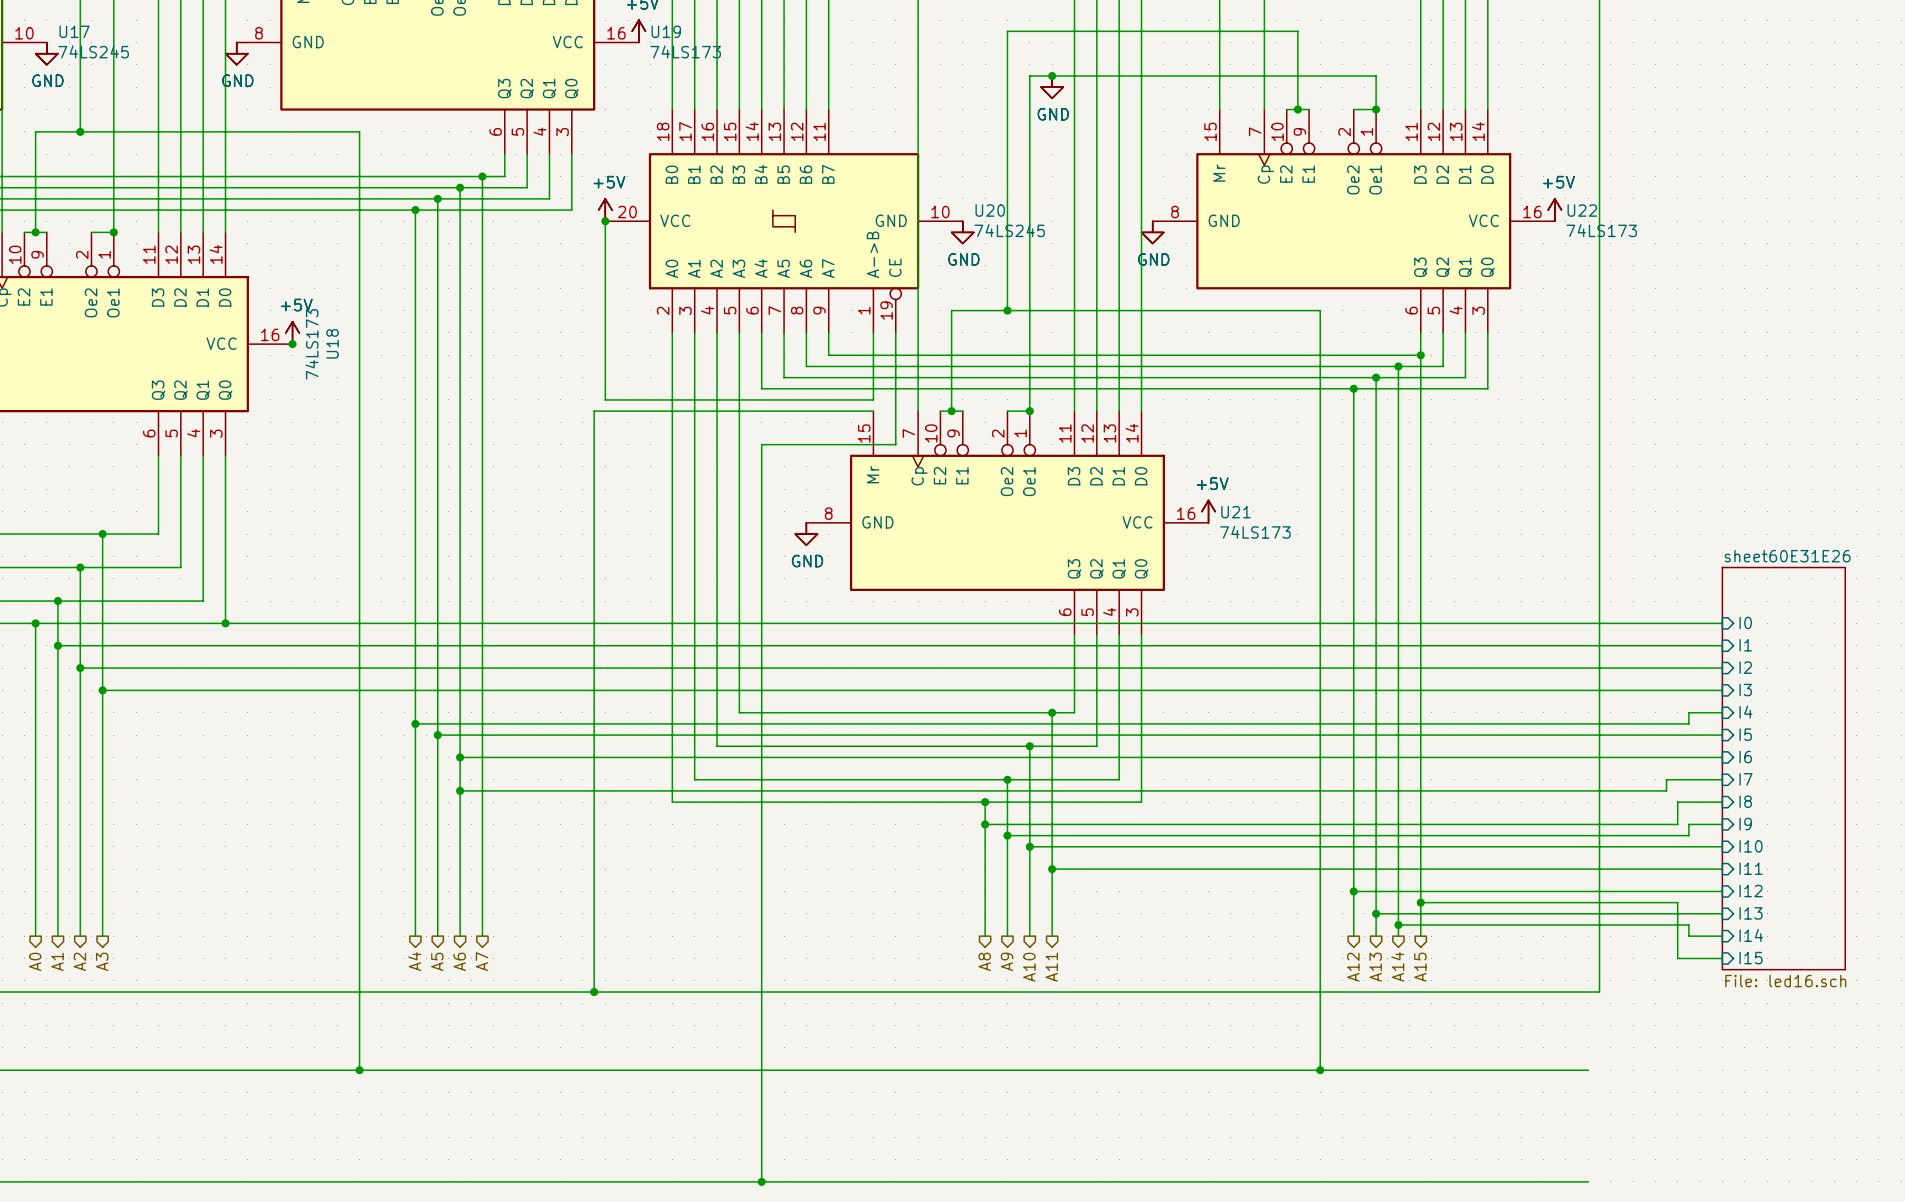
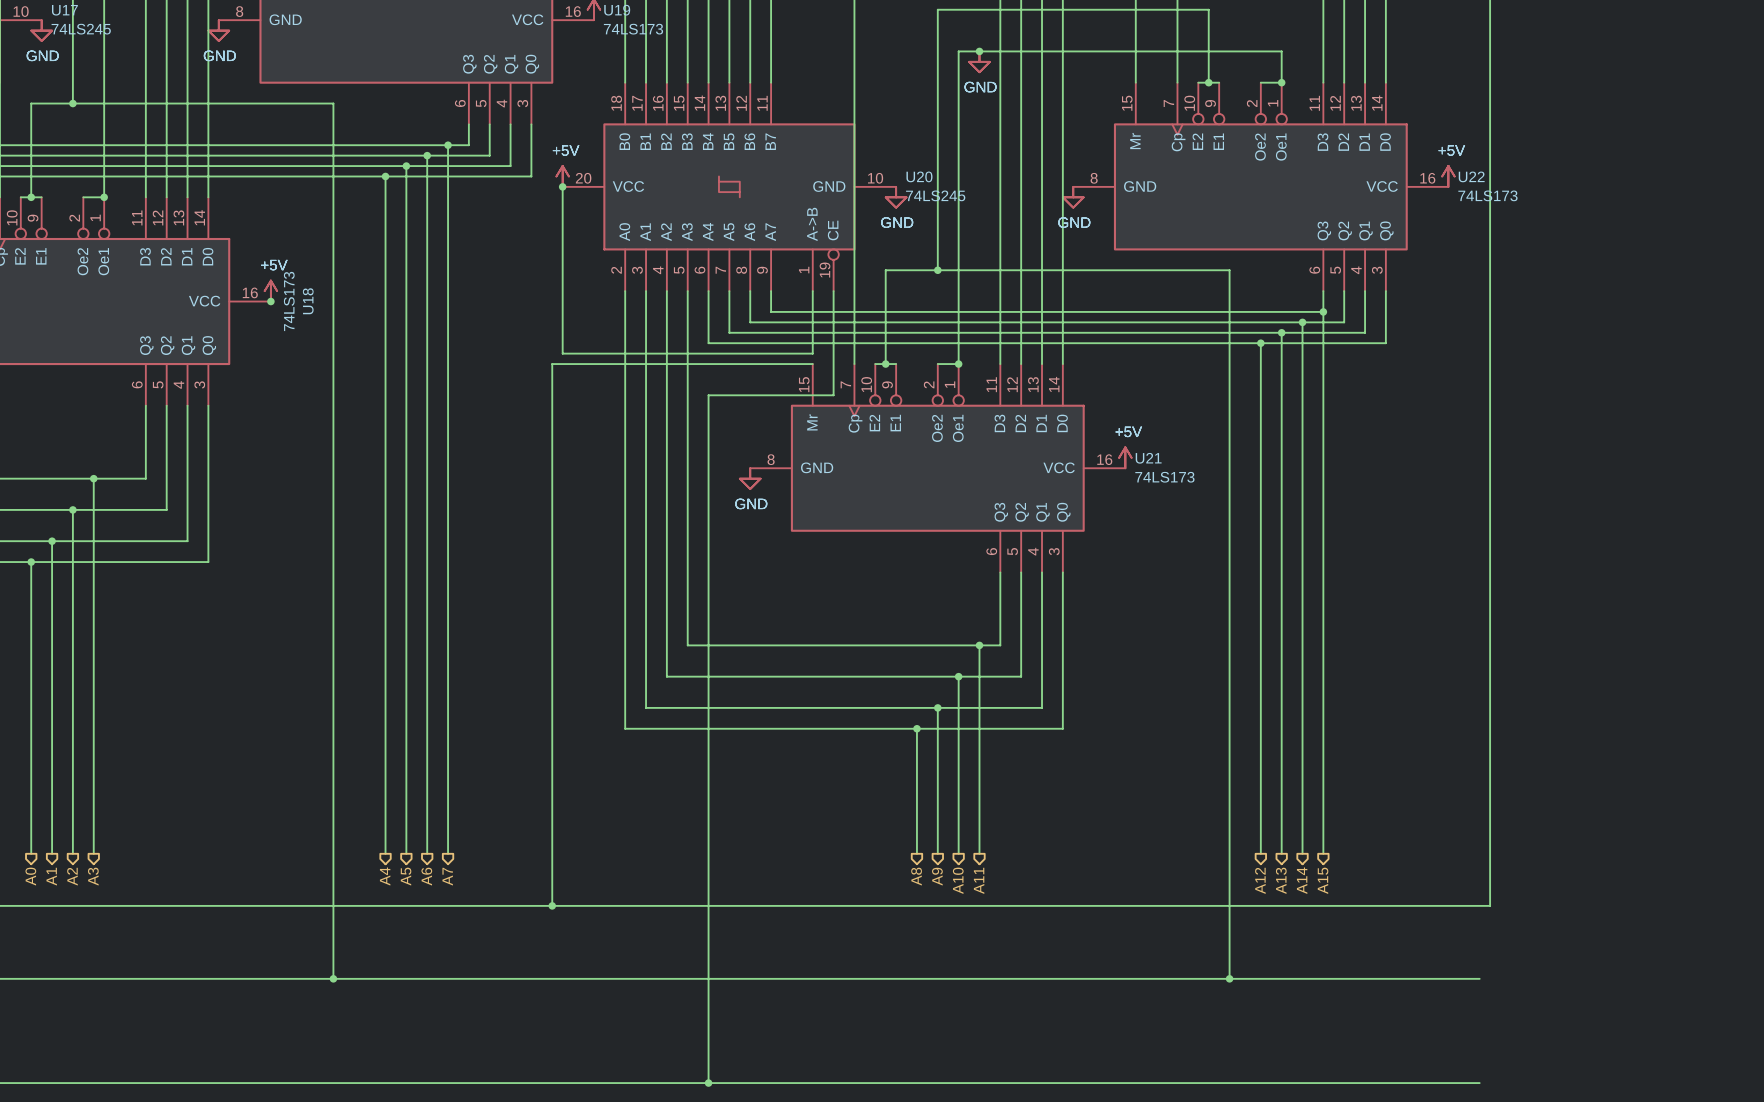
sheet pin: I0 (1745, 622) -> none
wire: (225, 623) (1722, 623) -> none
junction: (225, 623) -> none
wire: (57, 645) (1722, 645) -> none
junction: (57, 645) -> none
sheet pin: I1 (1745, 645) -> none
sheet pin: I2 (1745, 667) -> none
wire: (80, 668) (1722, 668) -> none
junction: (80, 668) -> none
sheet pin: I3 (1745, 689) -> none
wire: (102, 690) (1722, 690) -> none
junction: (102, 690) -> none
wire: (1722, 712) (1688, 712) (1688, 723) (415, 723) -> none
sheet pin: I4 (1745, 712) -> none
junction: (415, 723) -> none
sheet pin: I5 (1745, 734) -> none
wire: (437, 735) (1722, 735) -> none
junction: (437, 735) -> none
wire: (460, 757) (1722, 757) -> none
junction: (460, 757) -> none
sheet pin: I6 (1745, 757) -> none
sheet sheet60E31E26: File: led16.sch (1783, 768) -> none
wire: (1722, 779) (1666, 779) (1666, 790) (460, 790) -> none
sheet pin: I7 (1745, 779) -> none
junction: (460, 790) -> none
sheet pin: I8 (1745, 801) -> none
wire: (1722, 802) (1677, 802) (1677, 824) (985, 824) -> none
junction: (985, 824) -> none
wire: (1722, 824) (1688, 824) (1688, 835) (1007, 835) -> none
sheet pin: I9 (1745, 824) -> none
junction: (1007, 835) -> none
wire: (1029, 846) (1722, 846) -> none
junction: (1029, 846) -> none
sheet pin: I10 (1751, 846) -> none
sheet pin: I11 (1751, 868) -> none
wire: (1052, 869) (1722, 869) -> none
junction: (1052, 869) -> none
wire: (1353, 891) (1722, 891) -> none
junction: (1353, 891) -> none
sheet pin: I12 (1751, 891) -> none
wire: (1420, 902) (1677, 902) (1677, 958) (1722, 958) -> none
junction: (1420, 902) -> none
wire: (1376, 913) (1722, 913) -> none
junction: (1376, 913) -> none
sheet pin: I13 (1751, 913) -> none
wire: (1398, 924) (1688, 924) (1688, 936) (1722, 936) -> none
junction: (1398, 924) -> none
sheet pin: I14 (1751, 935) -> none
sheet pin: I15 (1751, 958) -> none

